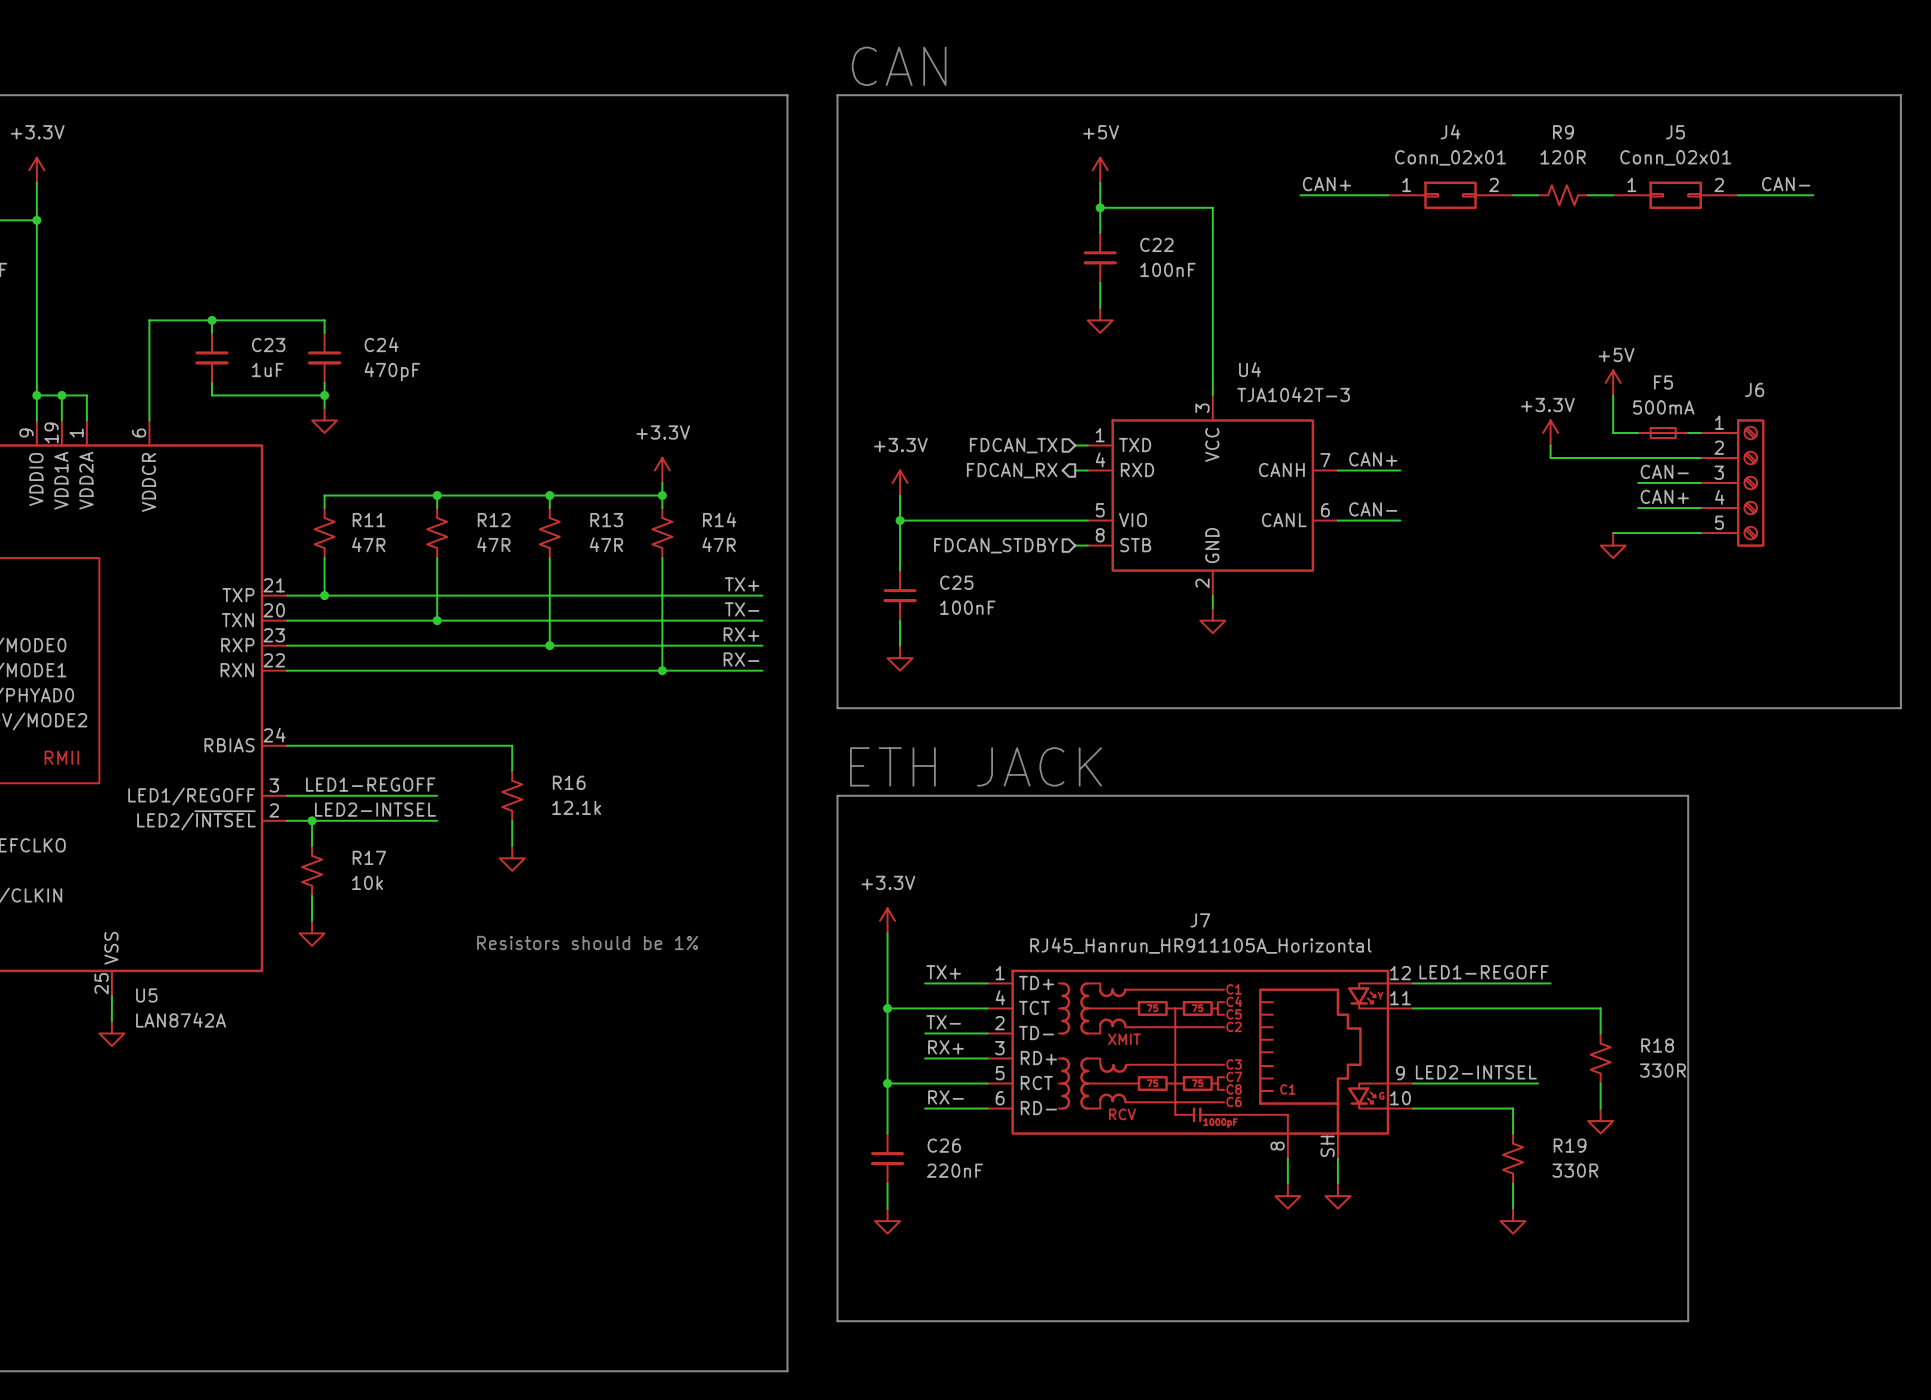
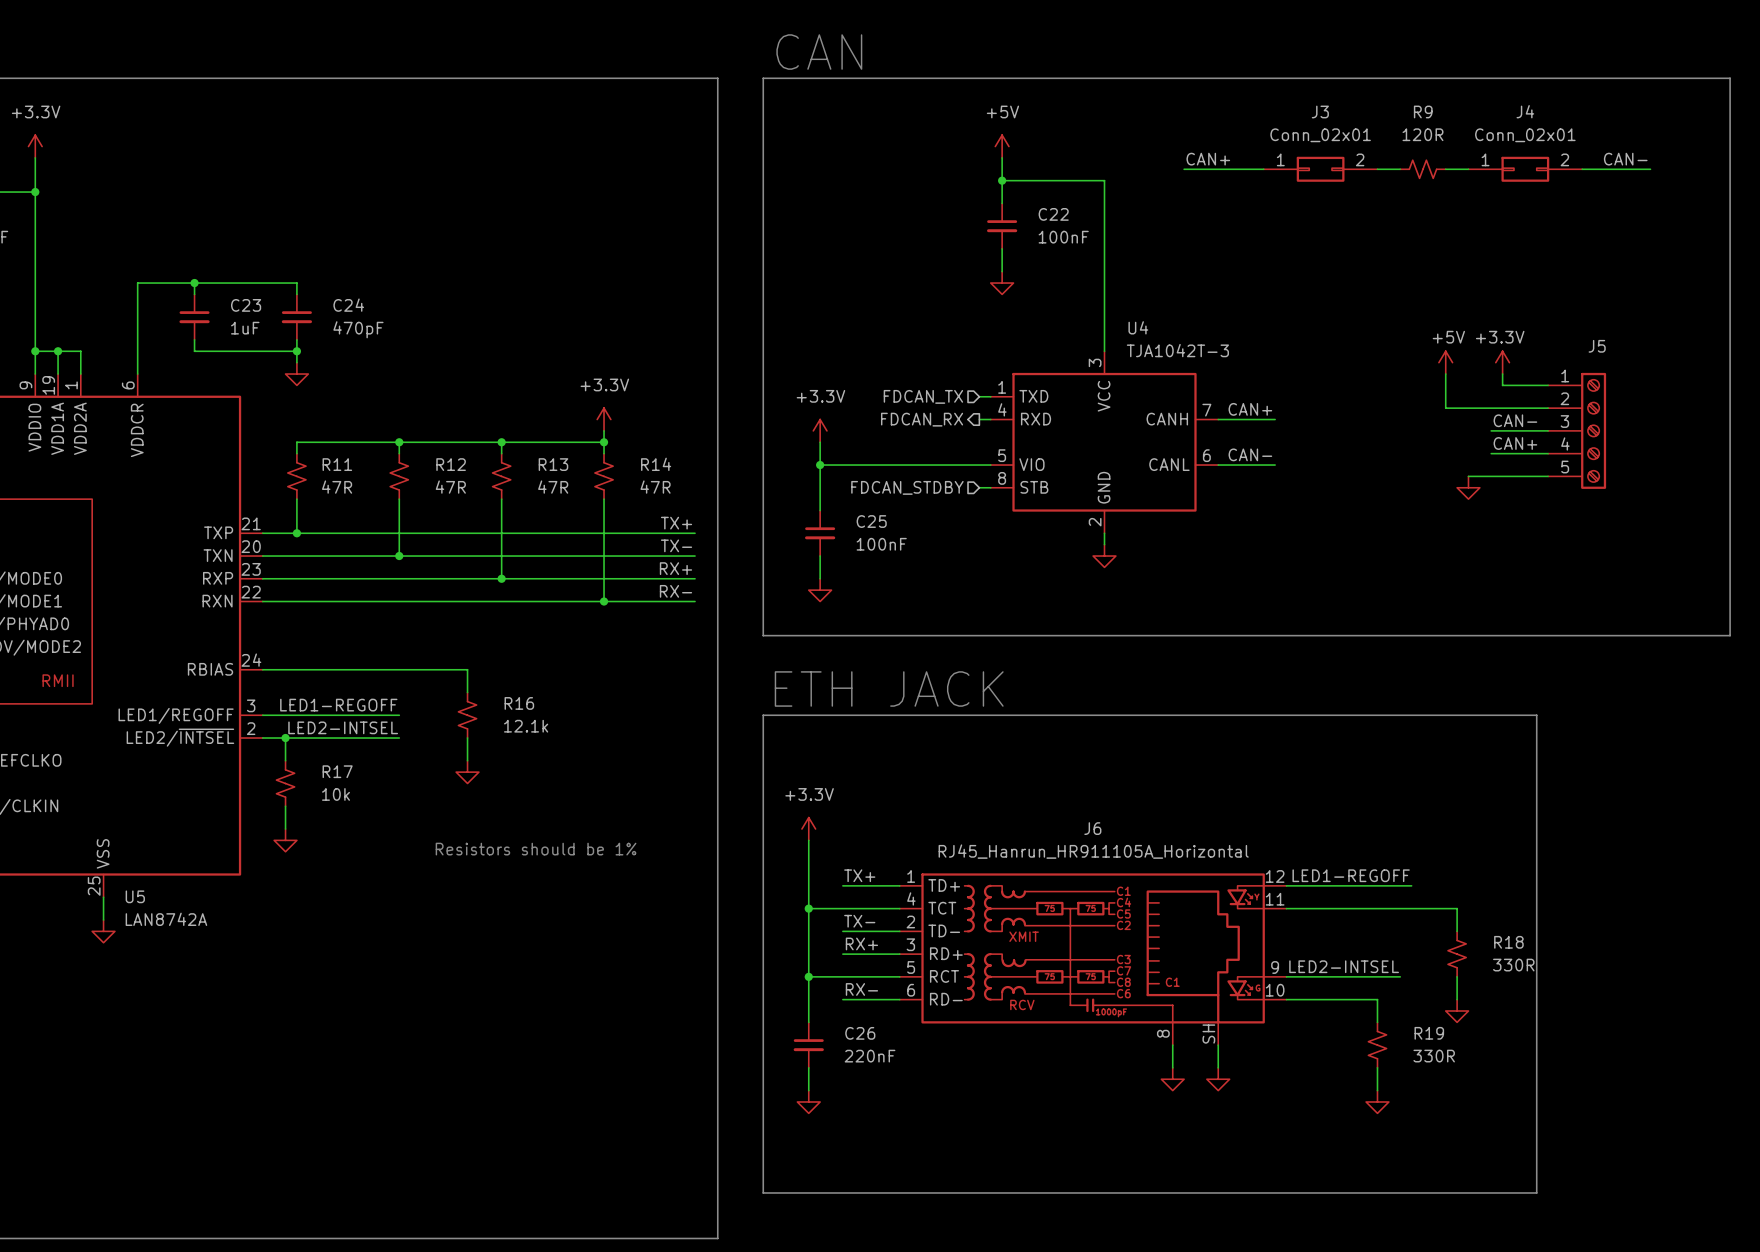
J4 name: J4 (1450, 131) -> J3 (1320, 111)
J5 name: J5 (1675, 132) -> J4 (1525, 111)
power symbol position: +5V (1613, 382) -> +5V (1445, 362)
J6 name: J6 (1754, 389) -> J5 (1597, 346)
wire: (1613, 395) (1613, 432) (1638, 432) -> none
power symbol position: +3.3V (1550, 432) -> +3.3V (1502, 362)
F5: 500mA (1663, 432) -> none
wire: (1550, 445) (1550, 458) (1588, 458) -> (1445, 374) (1445, 408)
J7 name: J7 (1200, 920) -> J6 (1092, 828)

